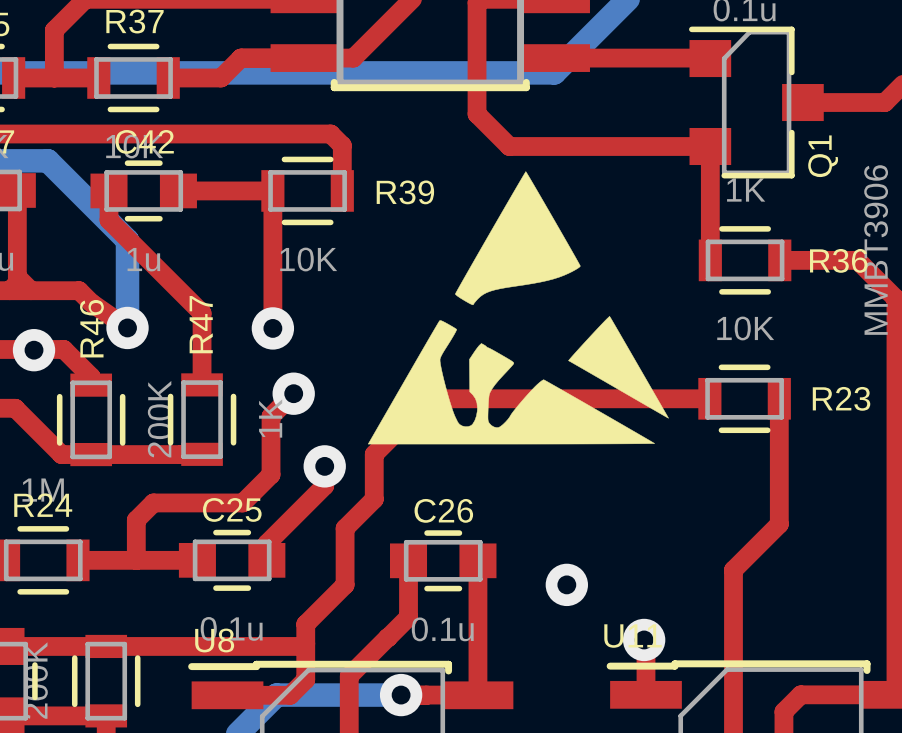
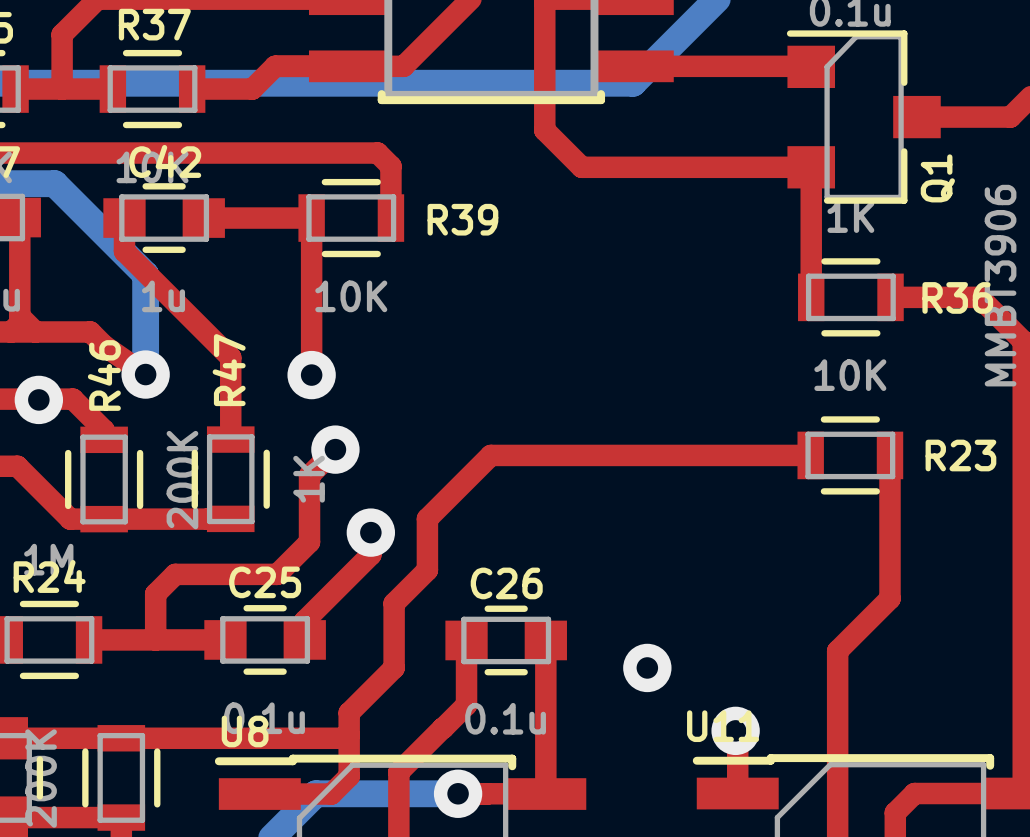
drawing: [367, 171, 669, 445] -> none

